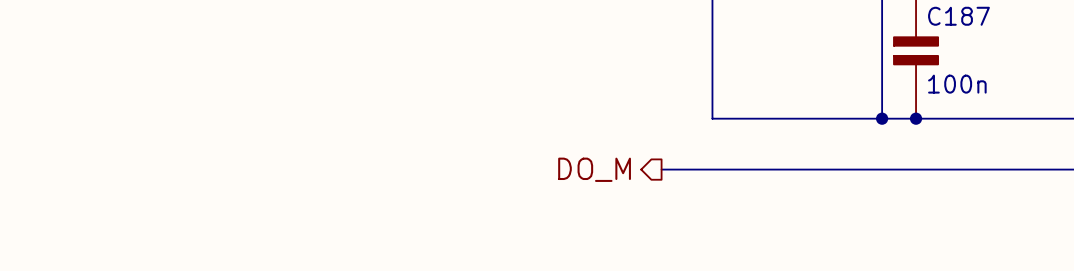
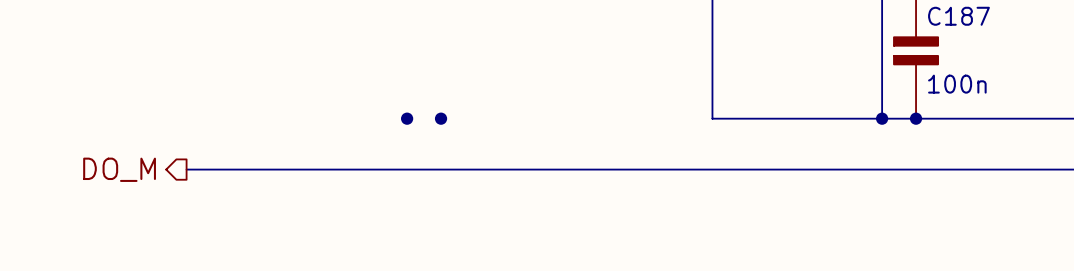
junction: none -> (407, 118)
junction: none -> (441, 118)
hierarchical label: none -> DO_M (119, 169)
wire: none -> (186, 169) (661, 169)
hierarchical label: DO_M (594, 169) -> none

